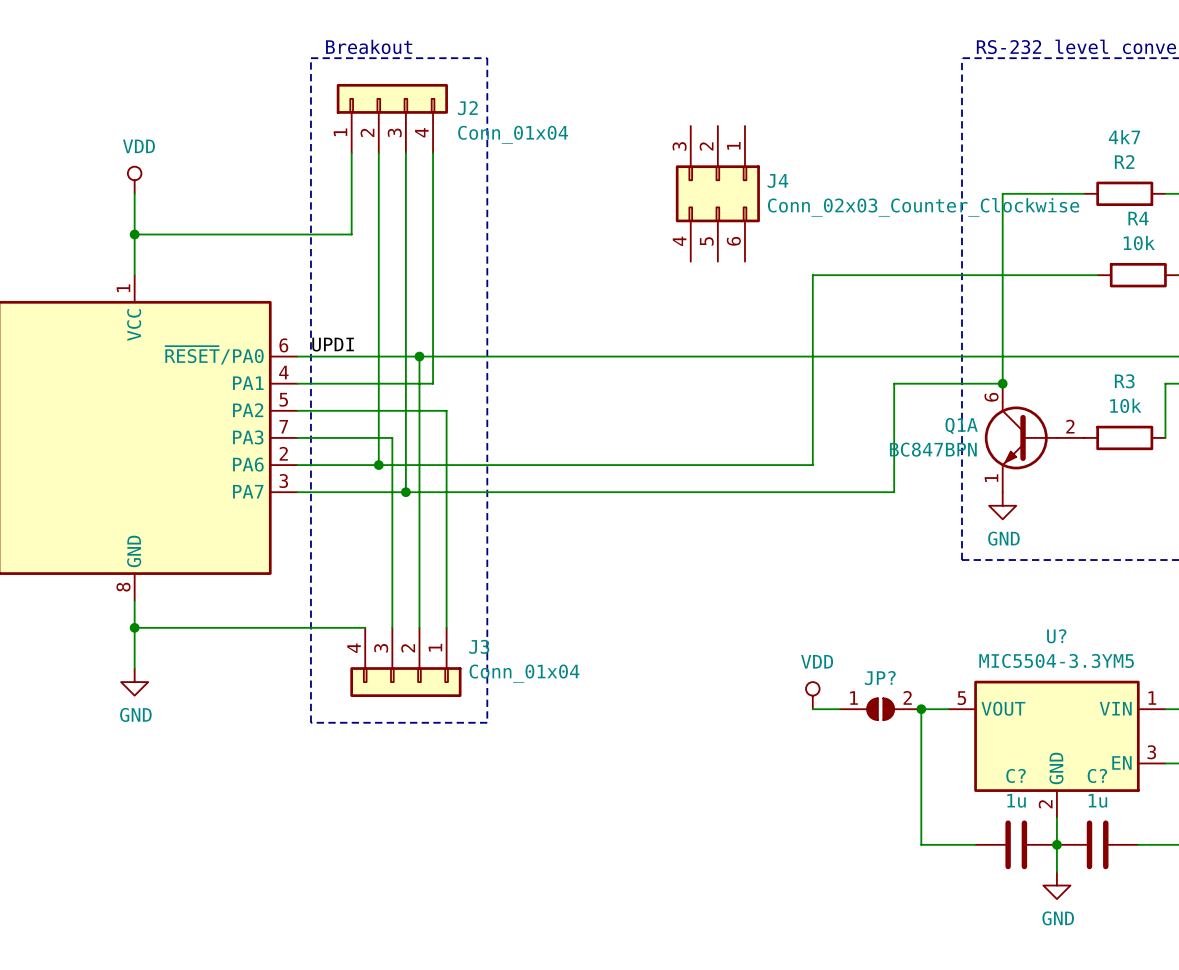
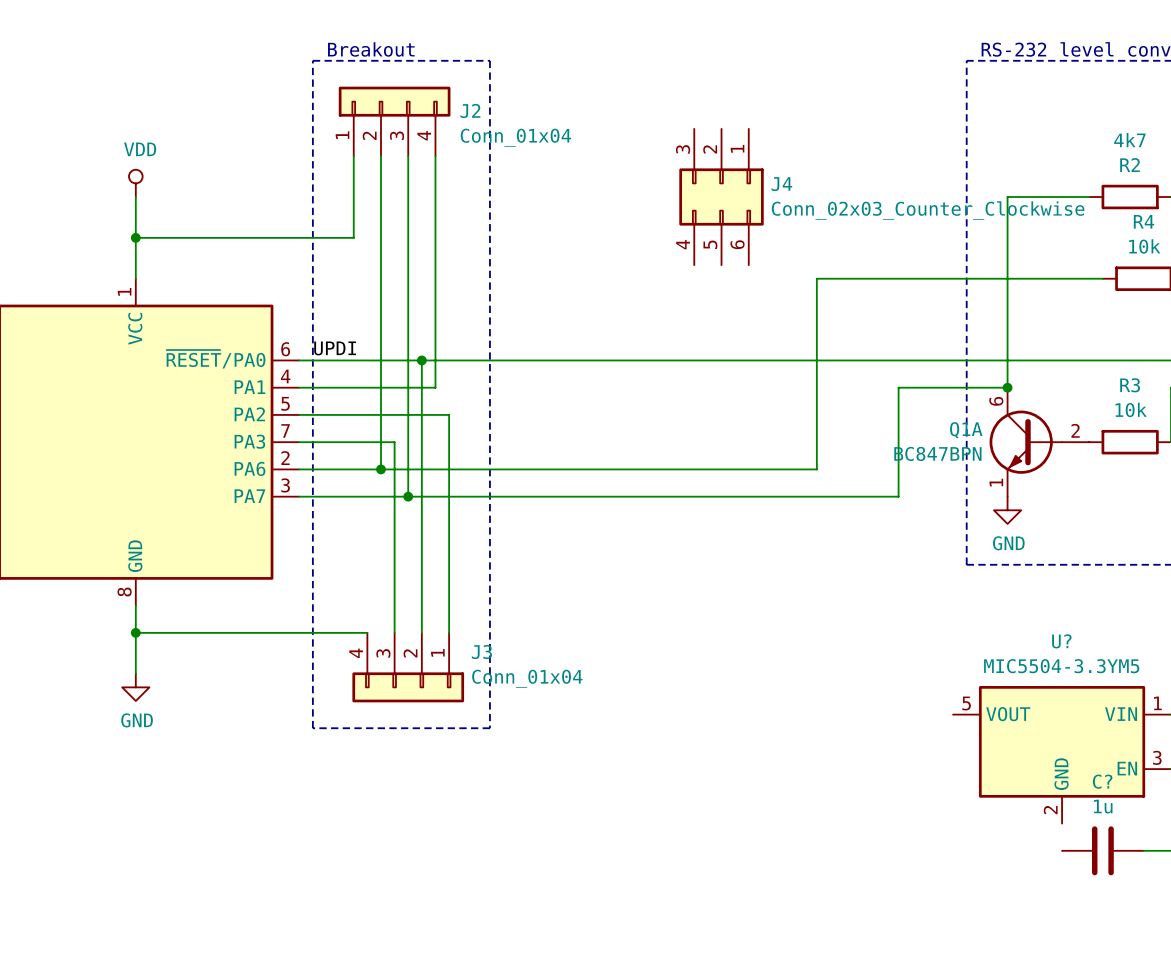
power symbol: VDD (812, 695) -> none
wire: (812, 709) (839, 709) -> none
JP?: (880, 709) -> none
junction: (921, 709) -> none
wire: (948, 709) (921, 709) (921, 844) (975, 844) -> none
wire: (1056, 817) (1056, 871) -> none
C?: 1u (1016, 844) -> none
junction: (1056, 844) -> none
power symbol: GND (1056, 885) -> none

